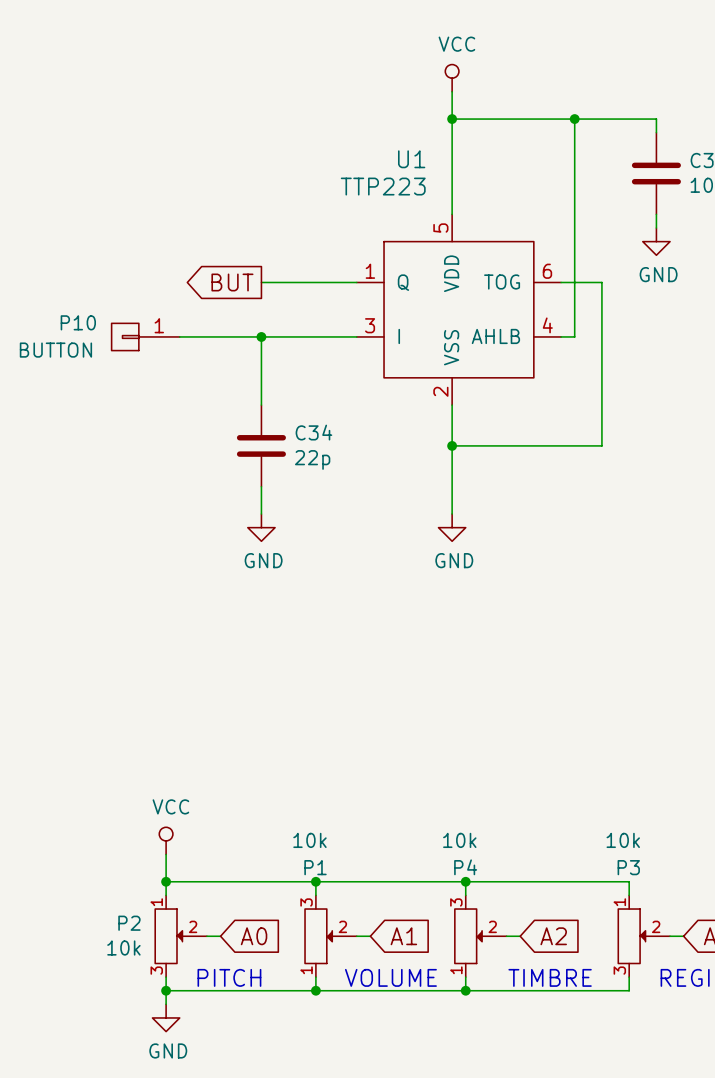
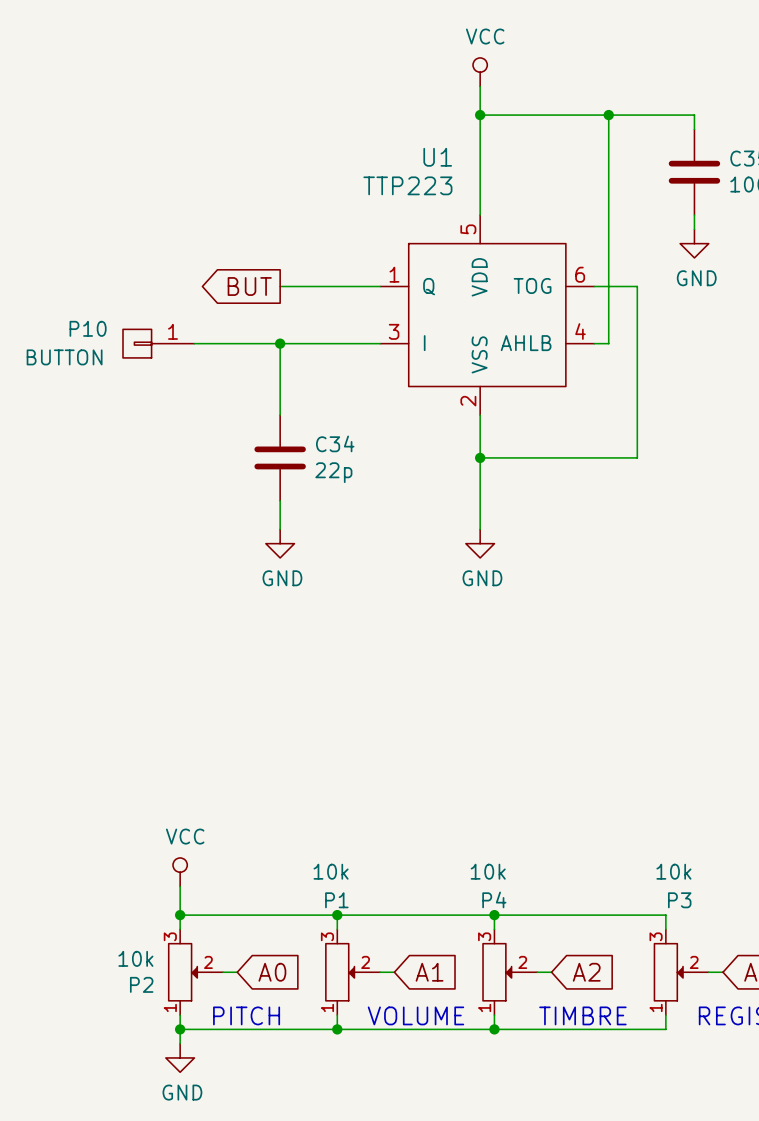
P2 flip: as is (168, 936) -> up-down (183, 972)
P3 flip: as is (631, 936) -> up-down (668, 972)

